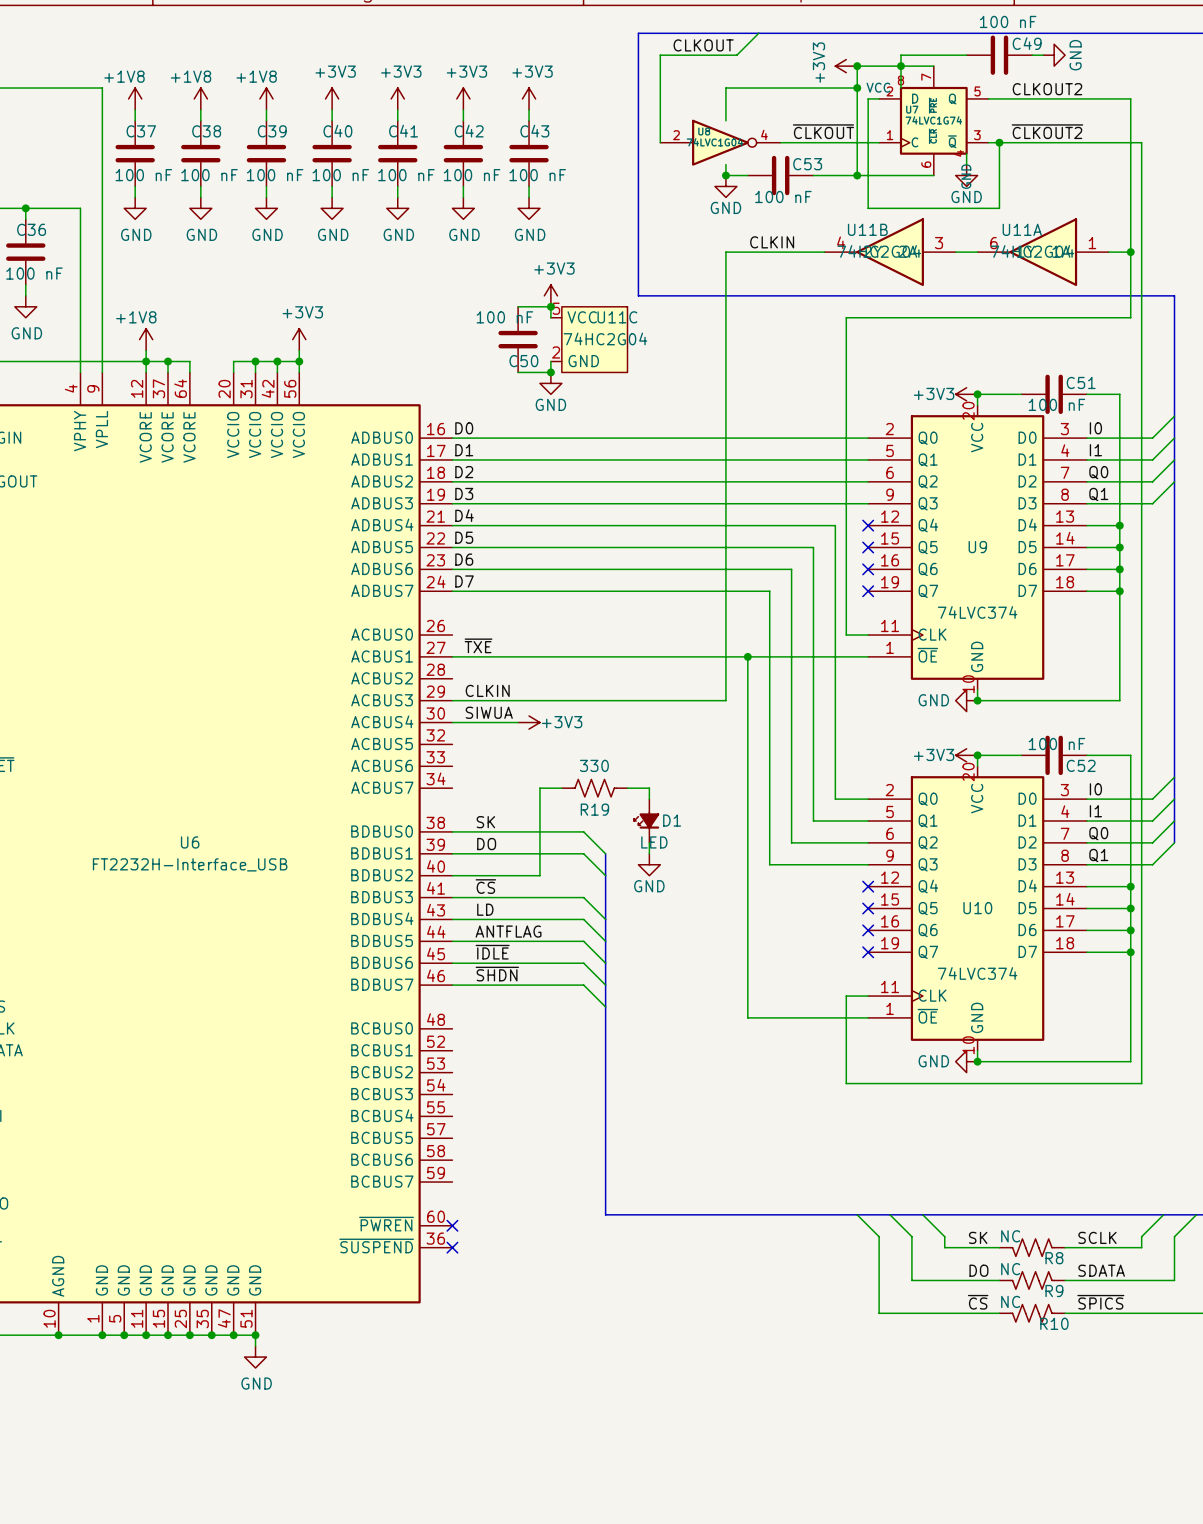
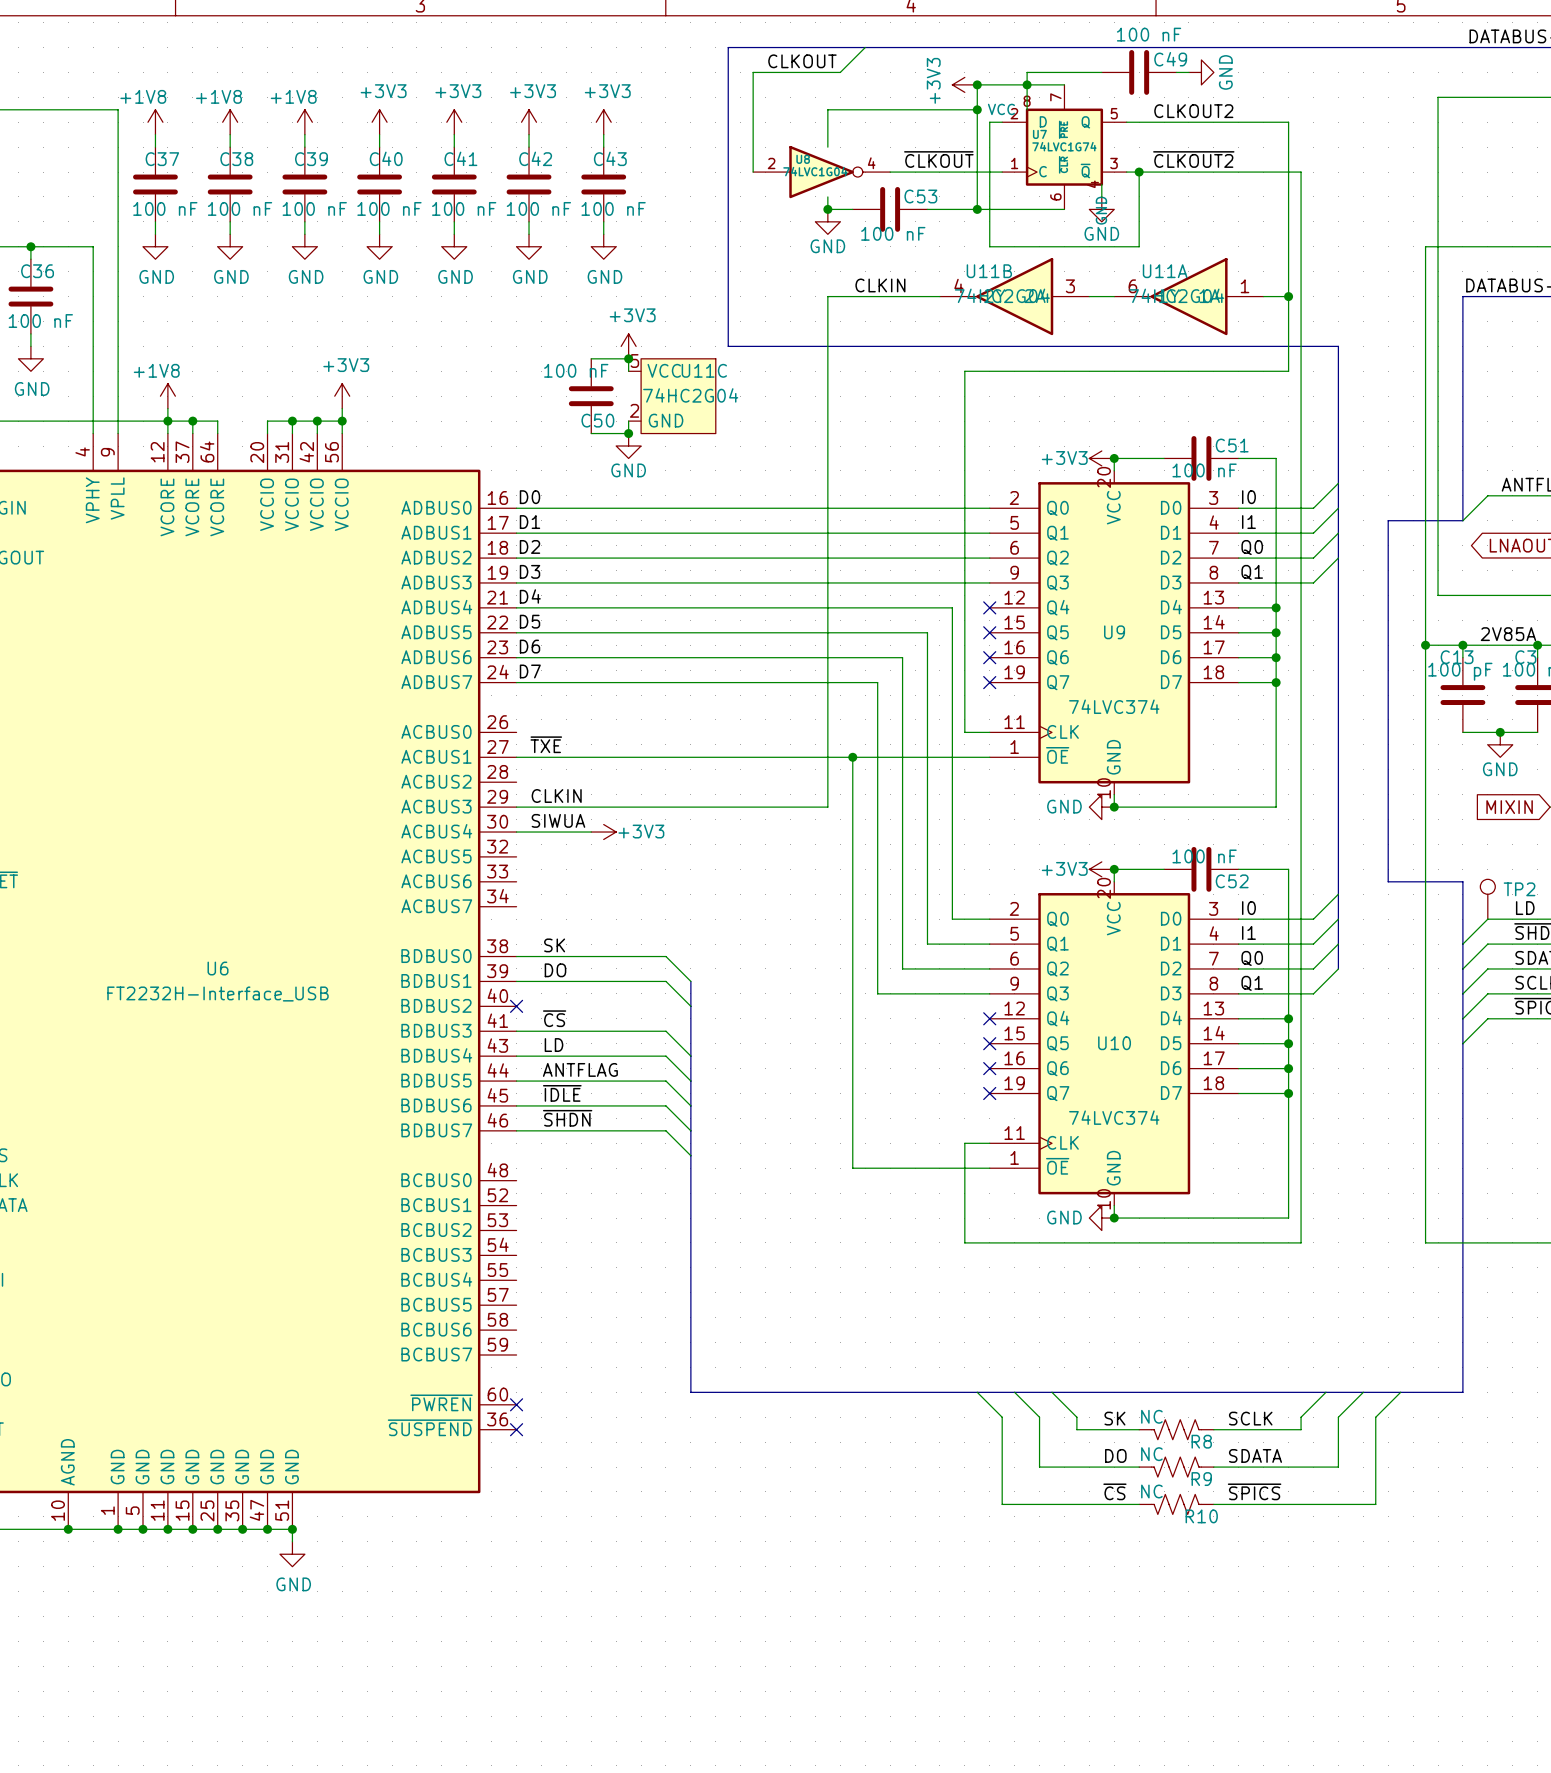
wire: (561, 788) (539, 788) (539, 875) (452, 875) -> none
R19: 330 (594, 788) -> none
wire: (627, 788) (649, 788) (649, 799) -> none
D1: LED (646, 820) -> none
wire: (649, 842) (649, 853) -> none
power symbol: GND (649, 864) -> none
no-connect mark: none -> (516, 1006)

